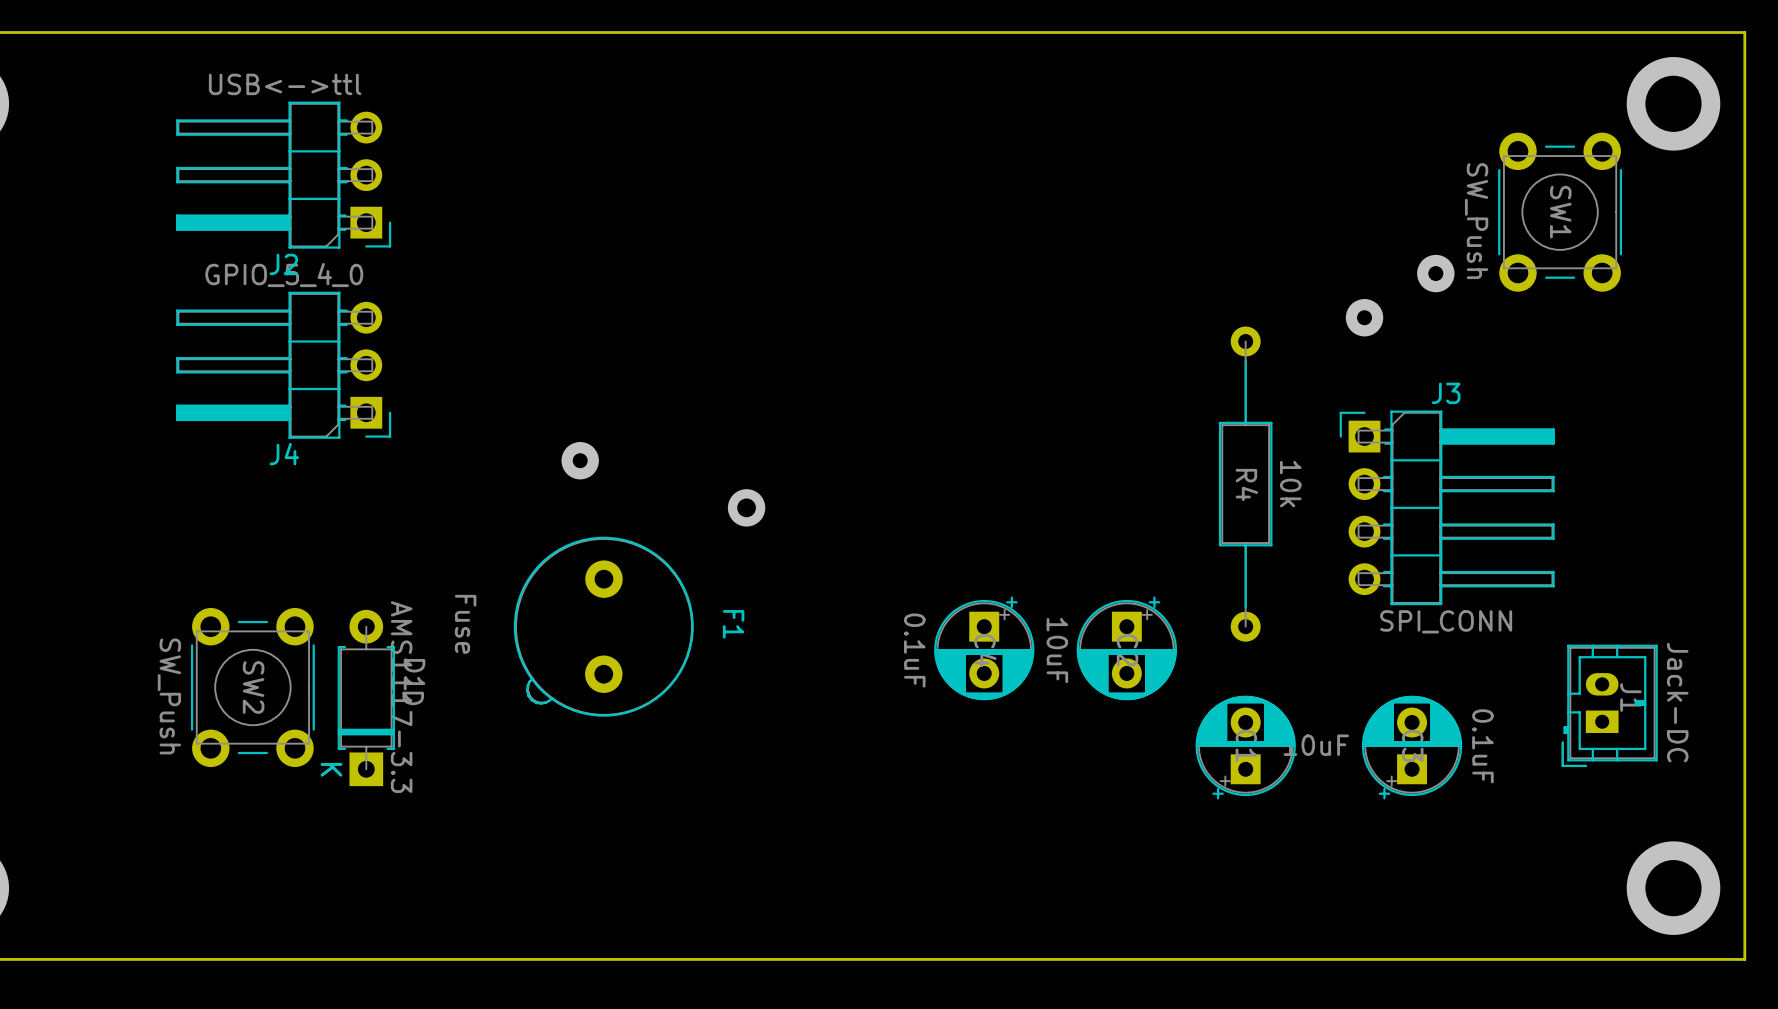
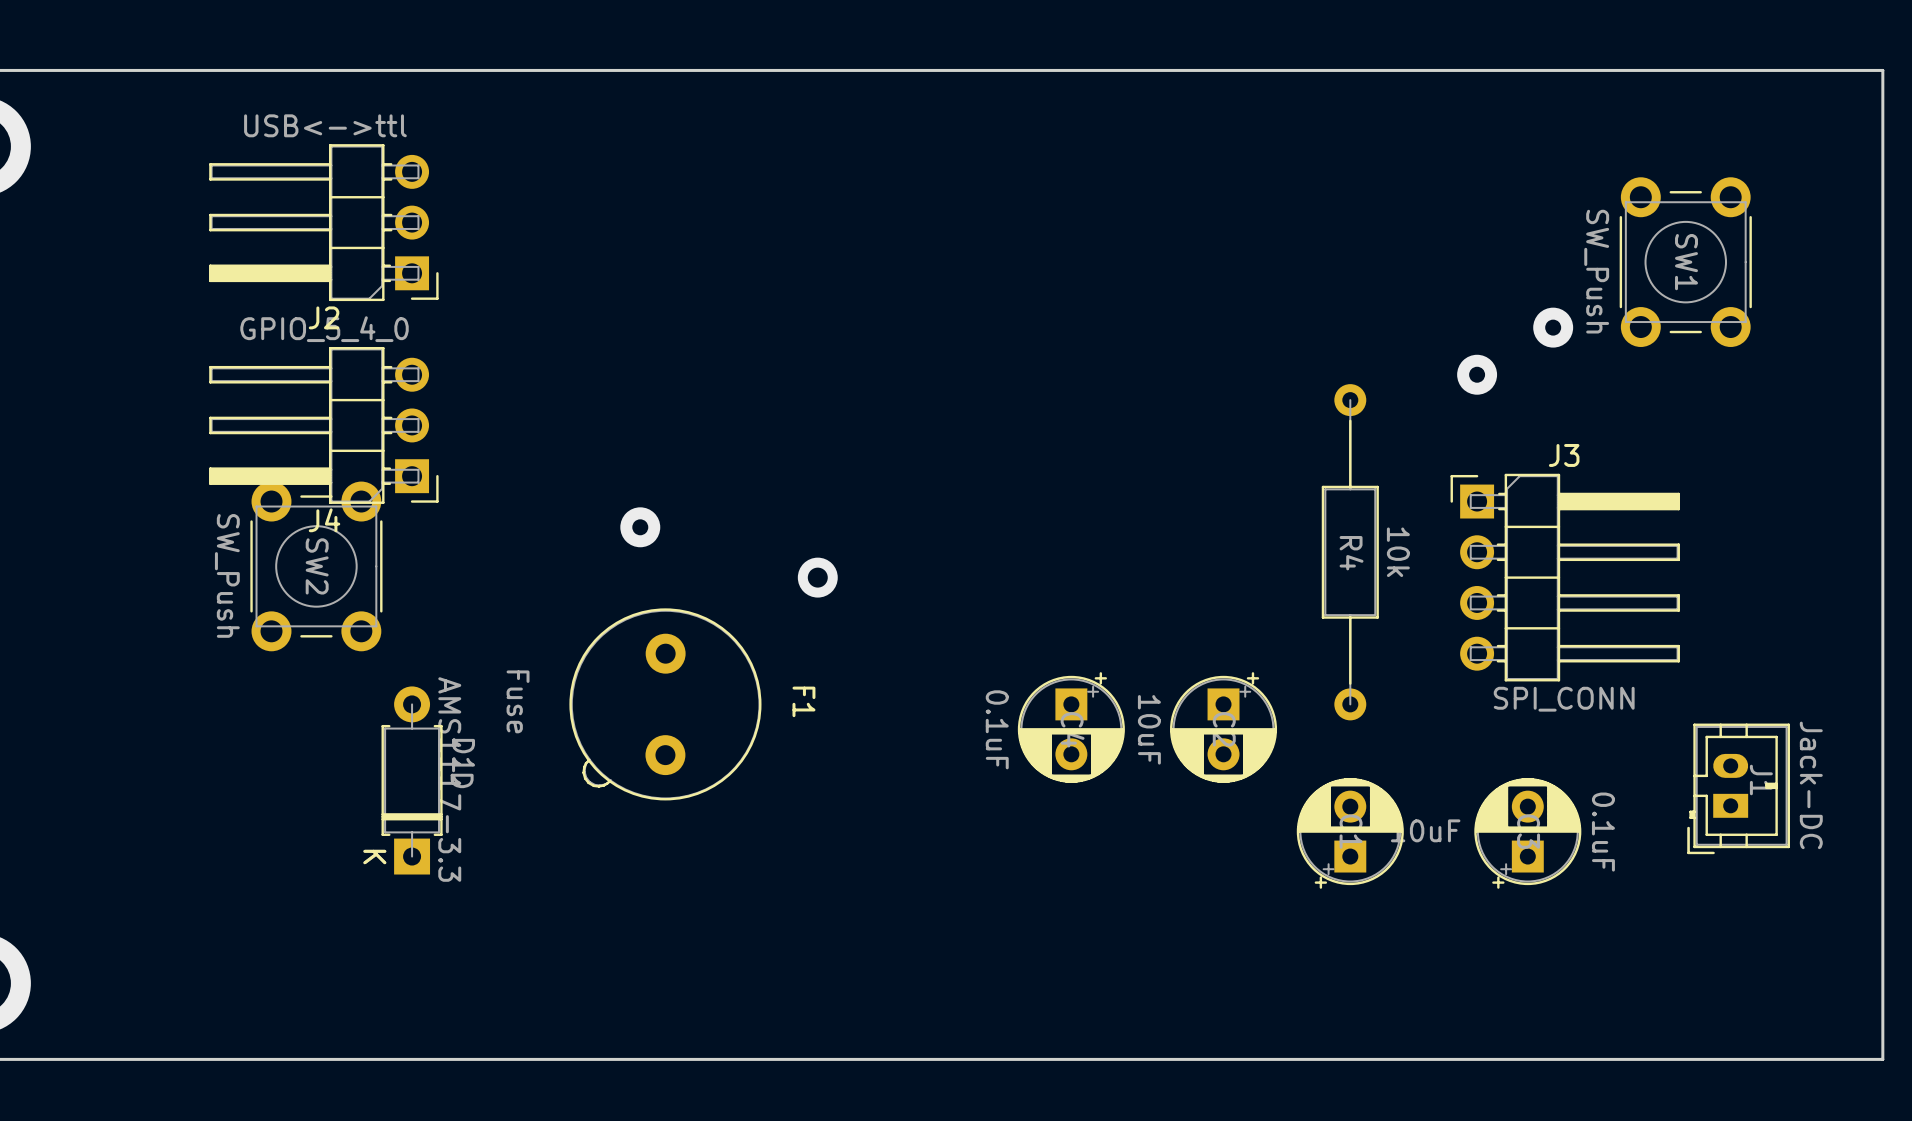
via: (1673, 103) -> none
SW2 position: (252, 687) -> (316, 566)
via: (1673, 888) -> none

